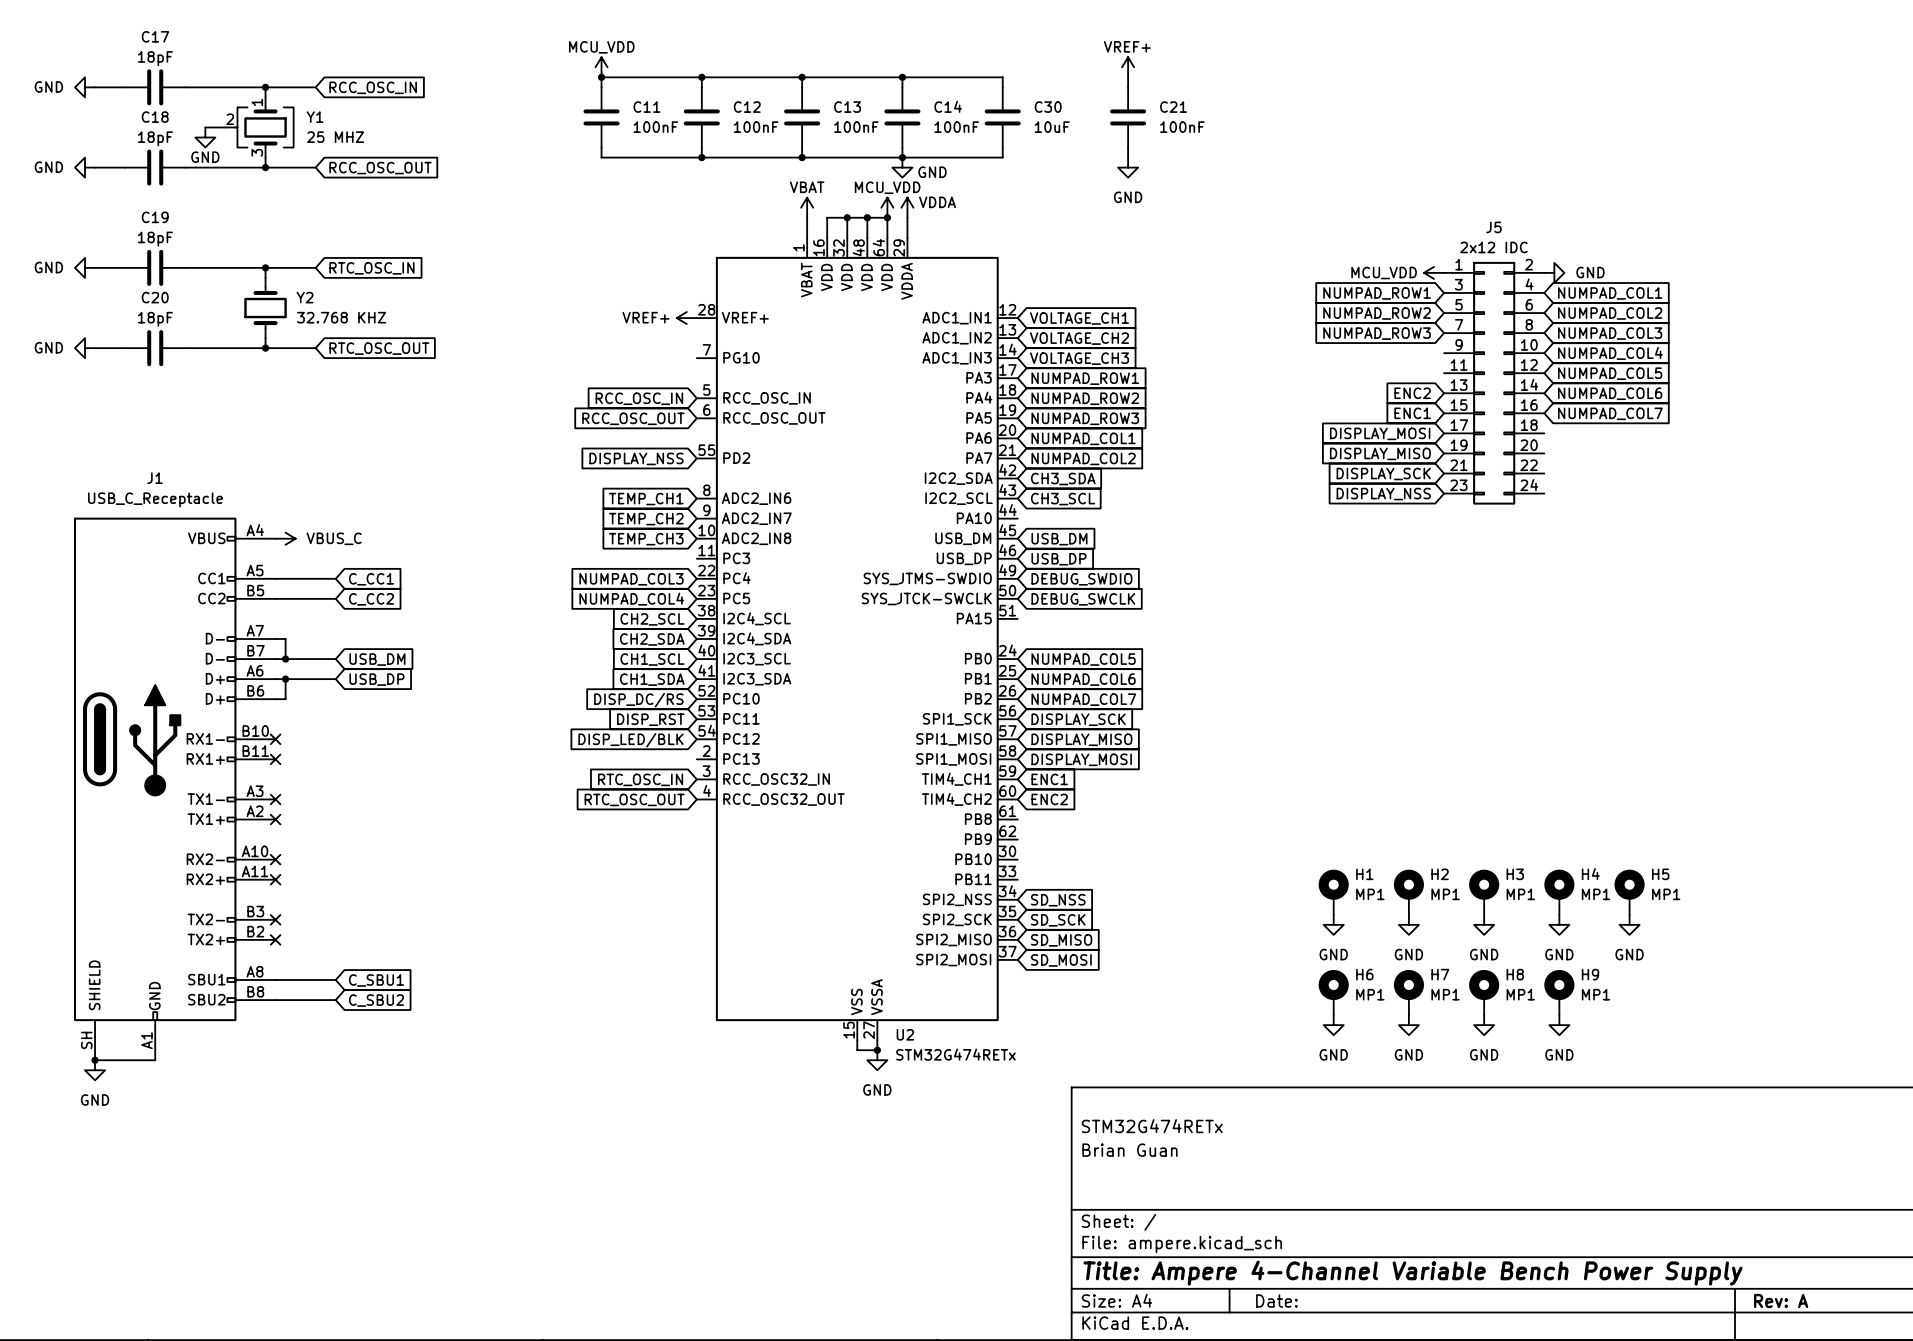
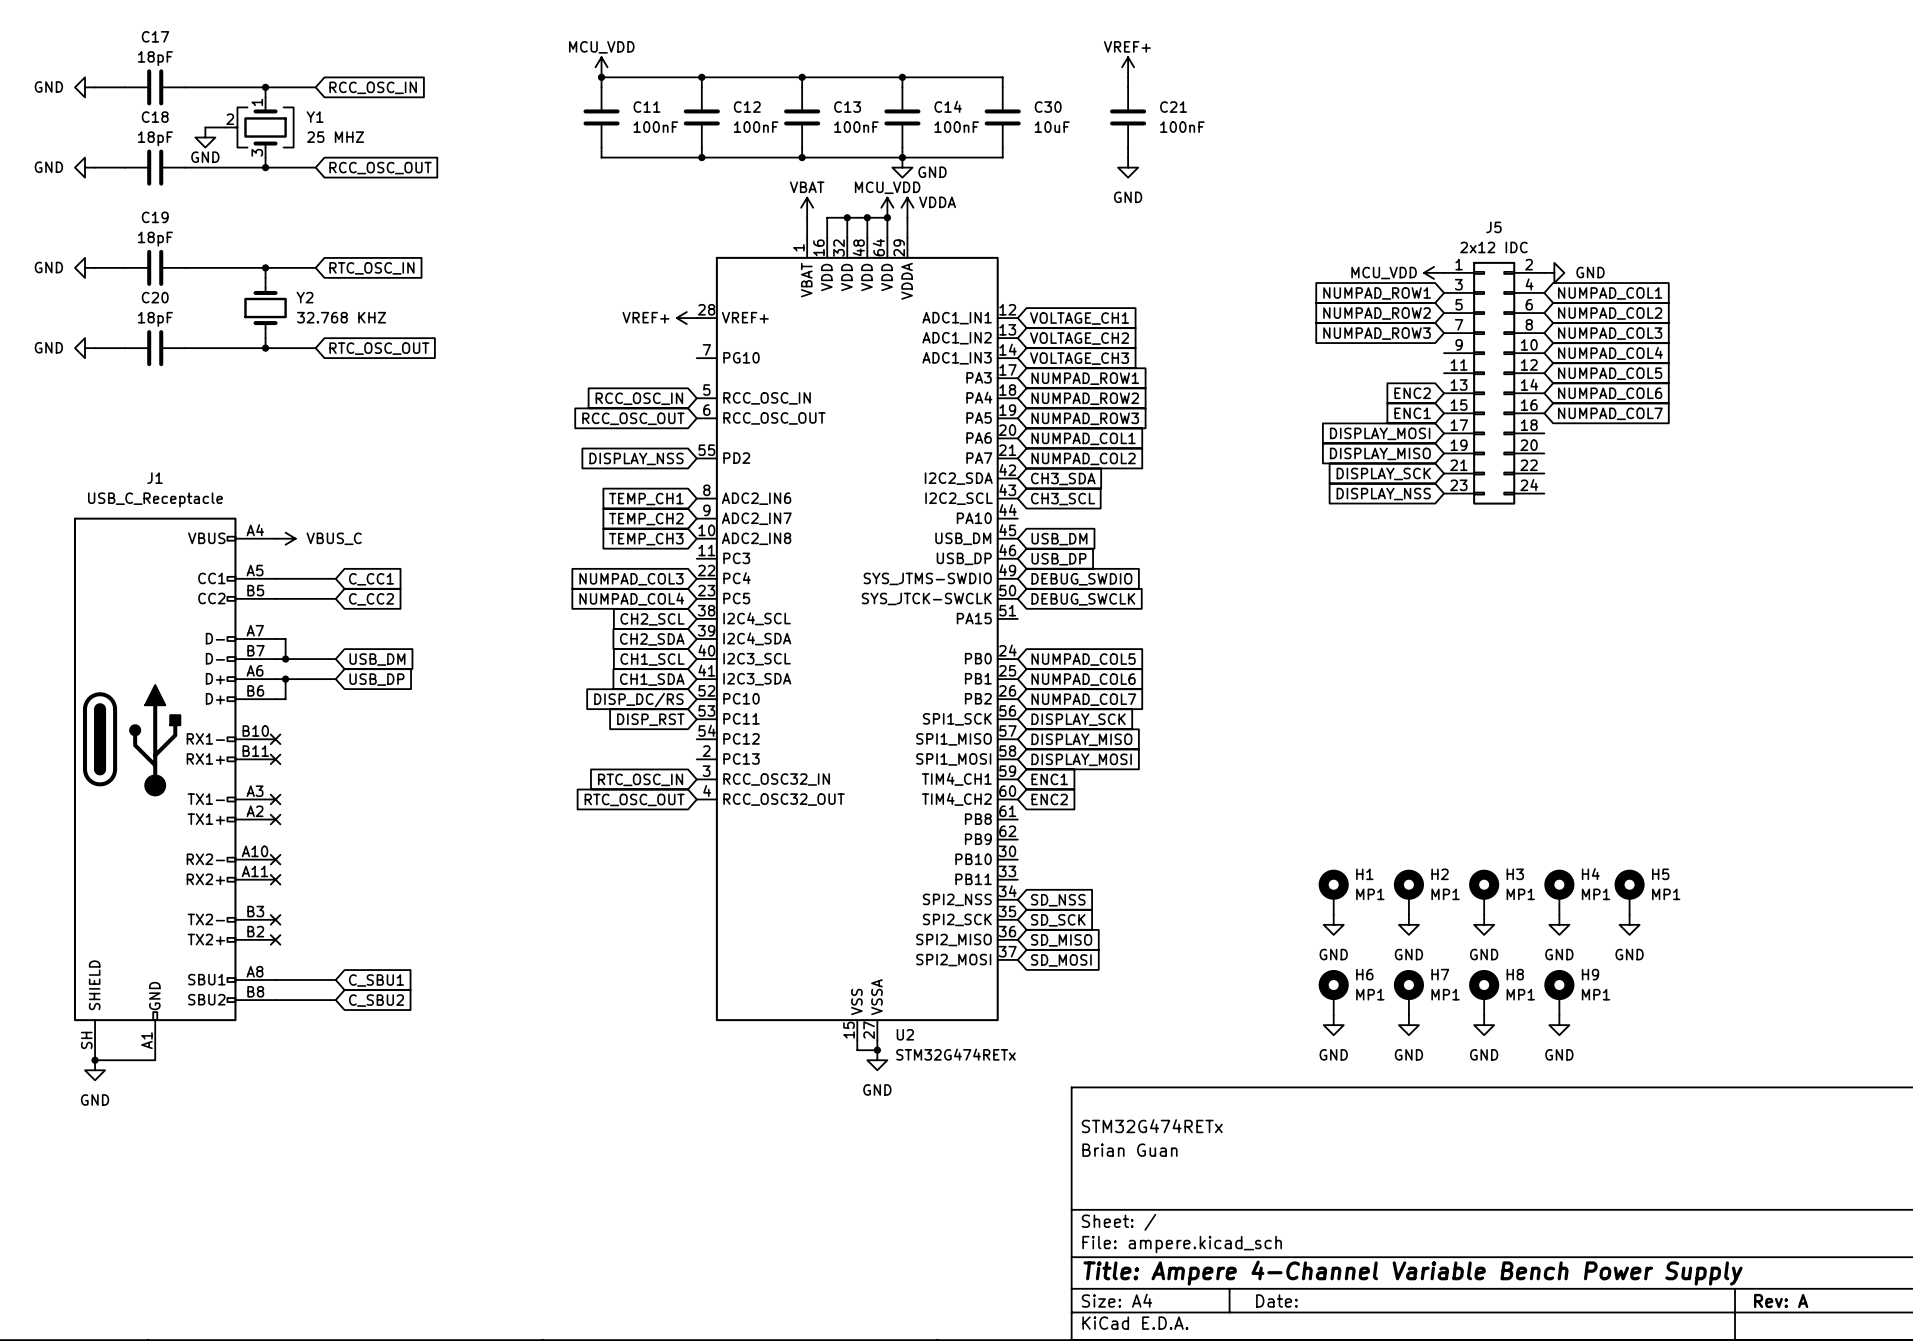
global label: DISP_LED/BLK (631, 740) -> none

